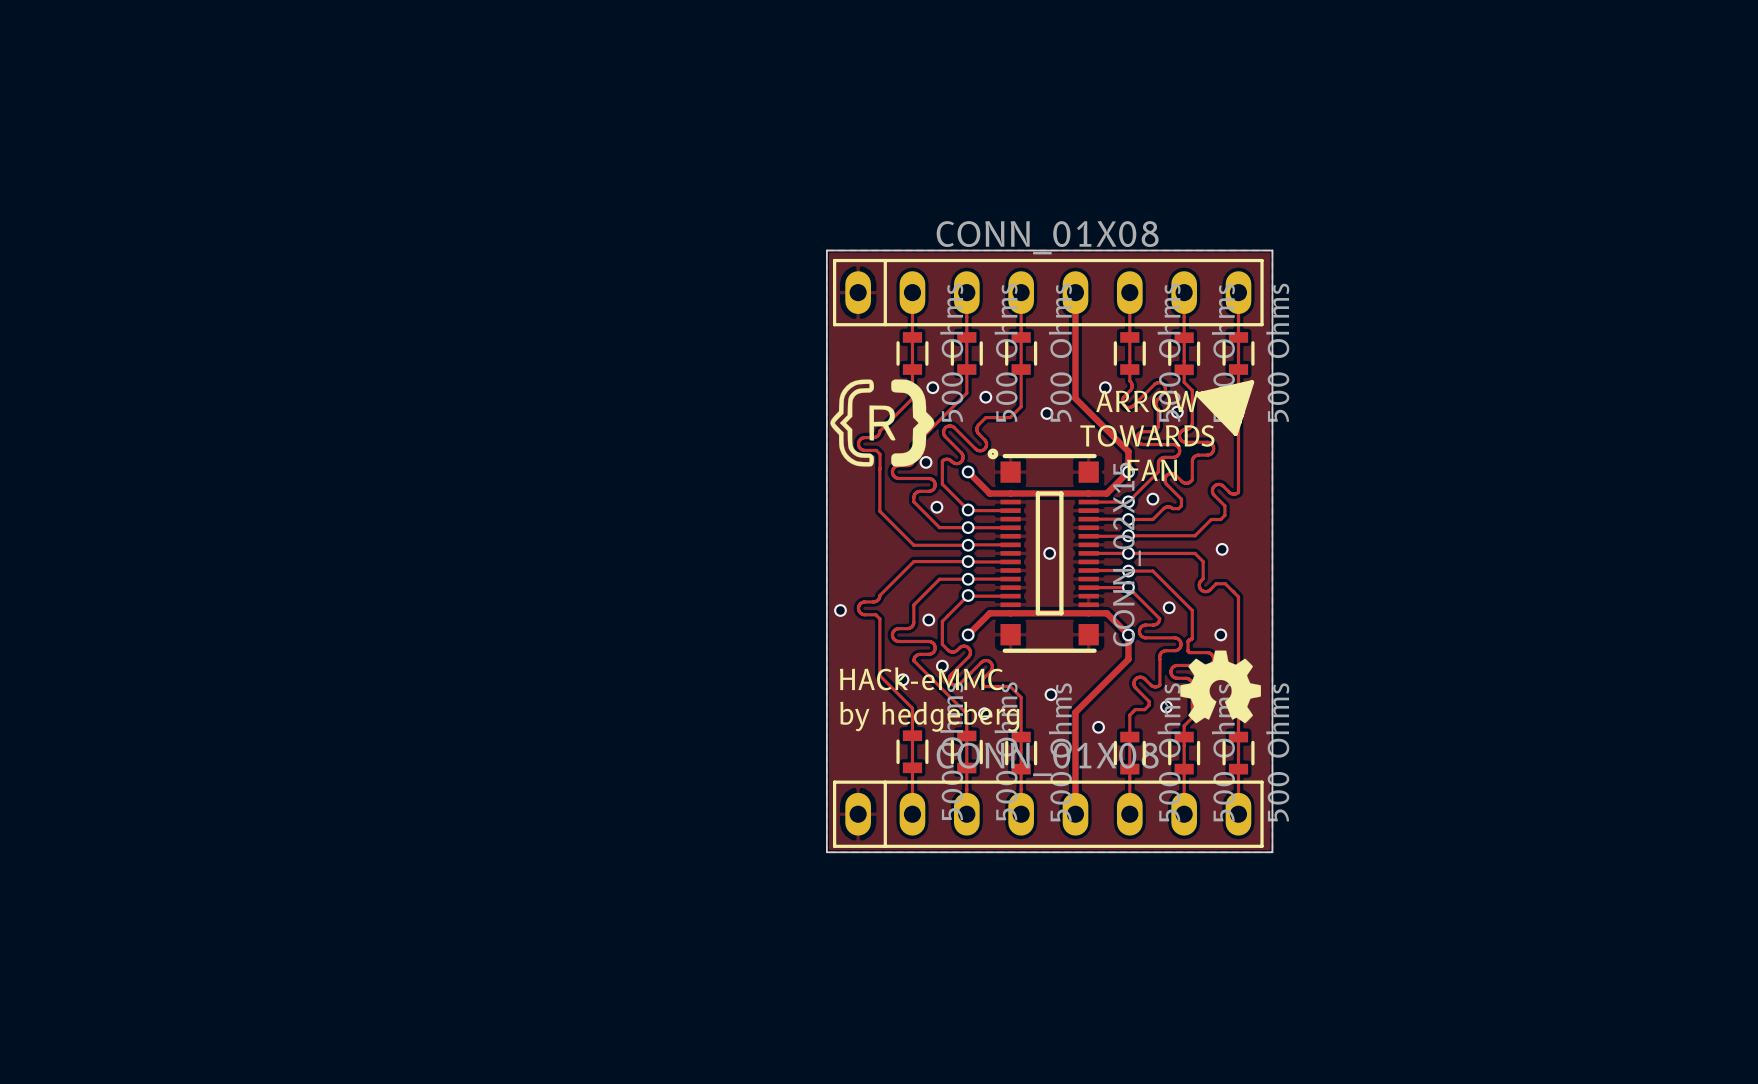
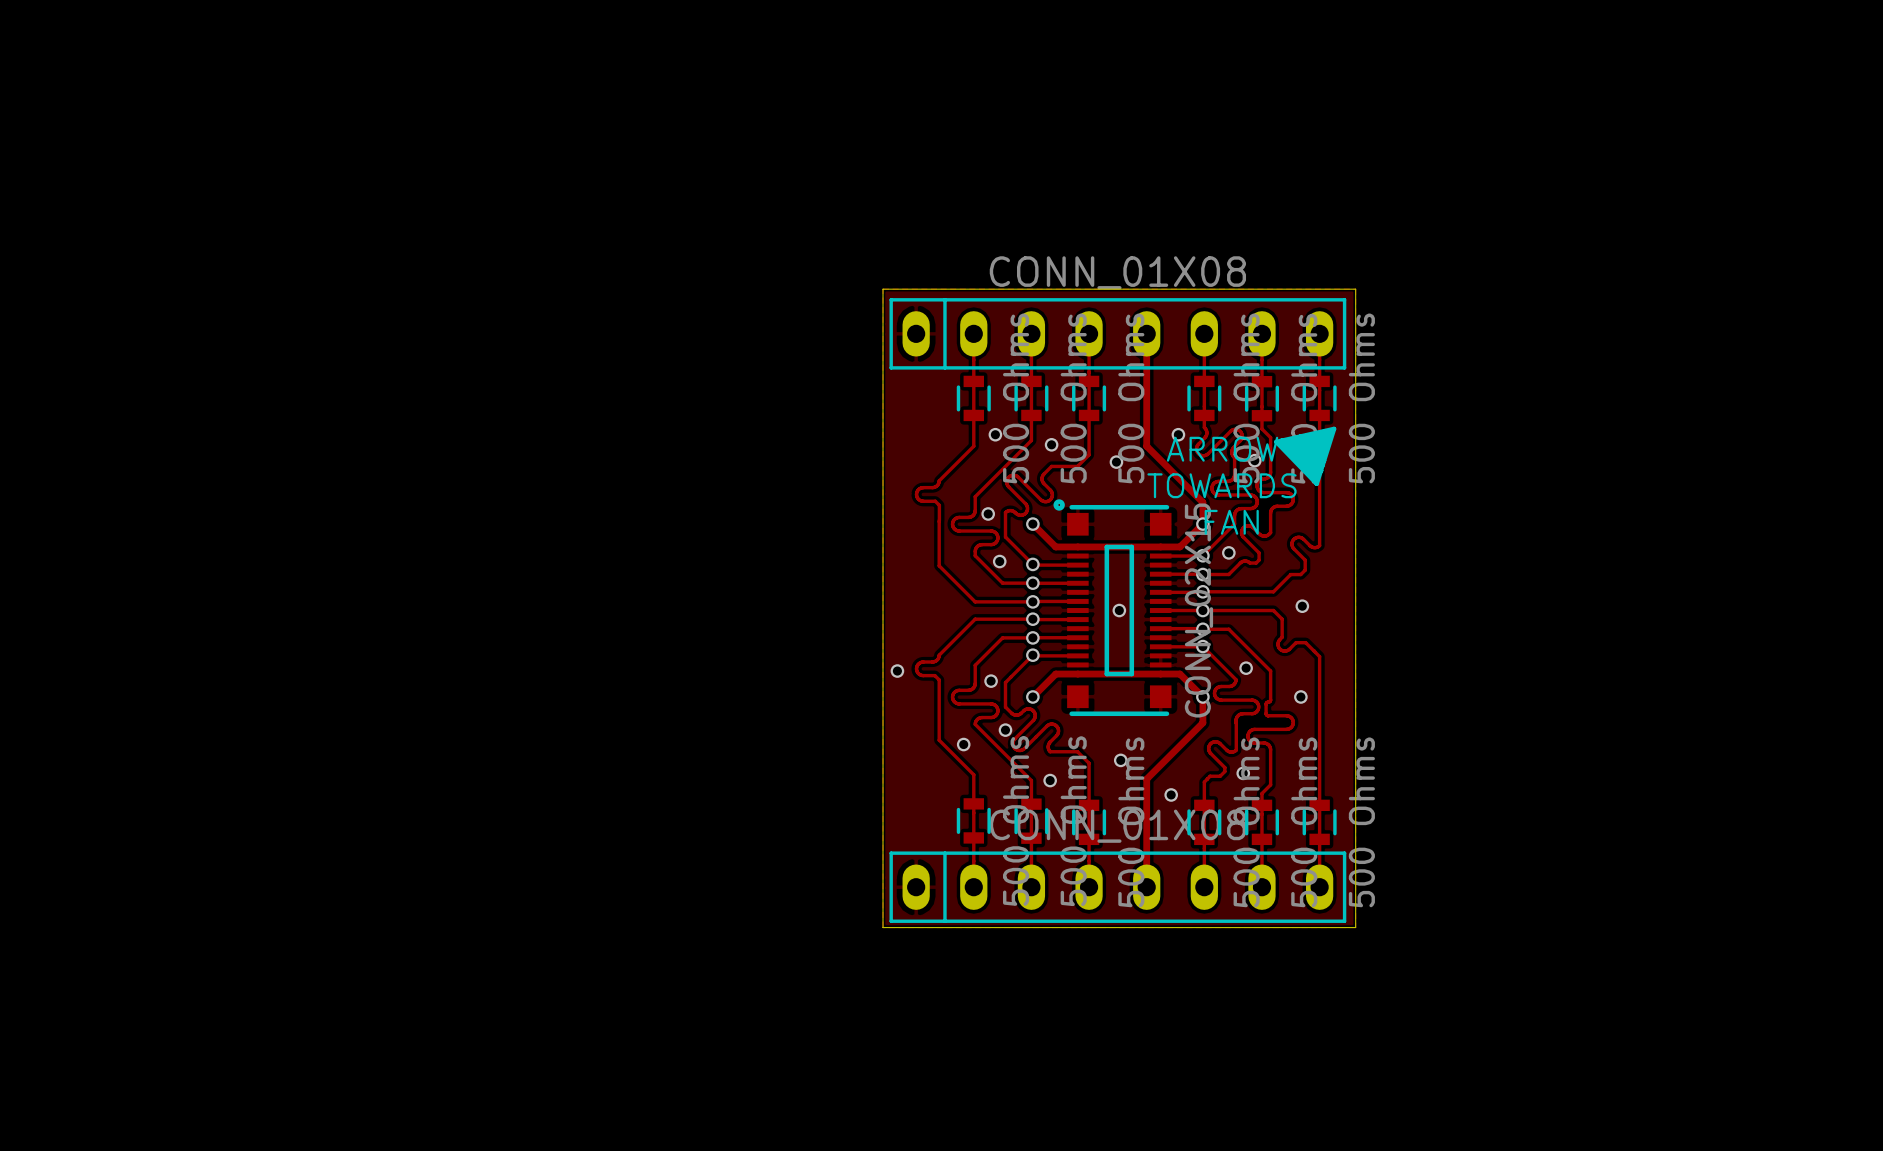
drawing: [830, 379, 935, 467] -> none
drawing: [1180, 650, 1262, 724] -> none
text: HACk-eMMC (921, 678) -> none
text: by hedgeberg (929, 716) -> none

